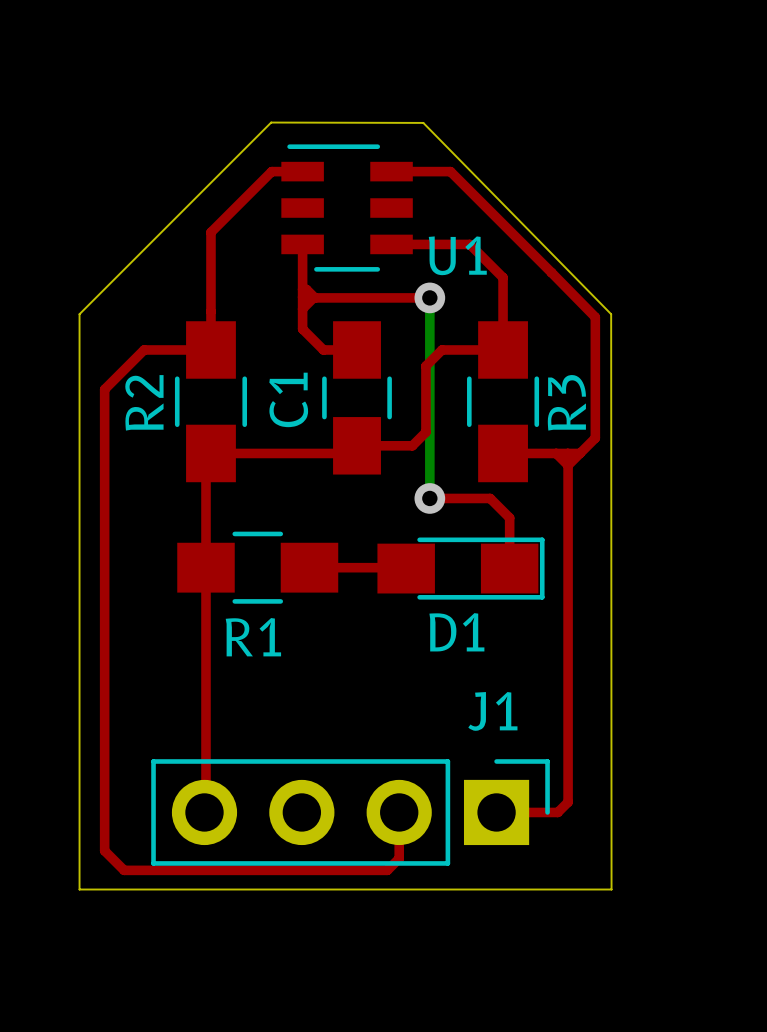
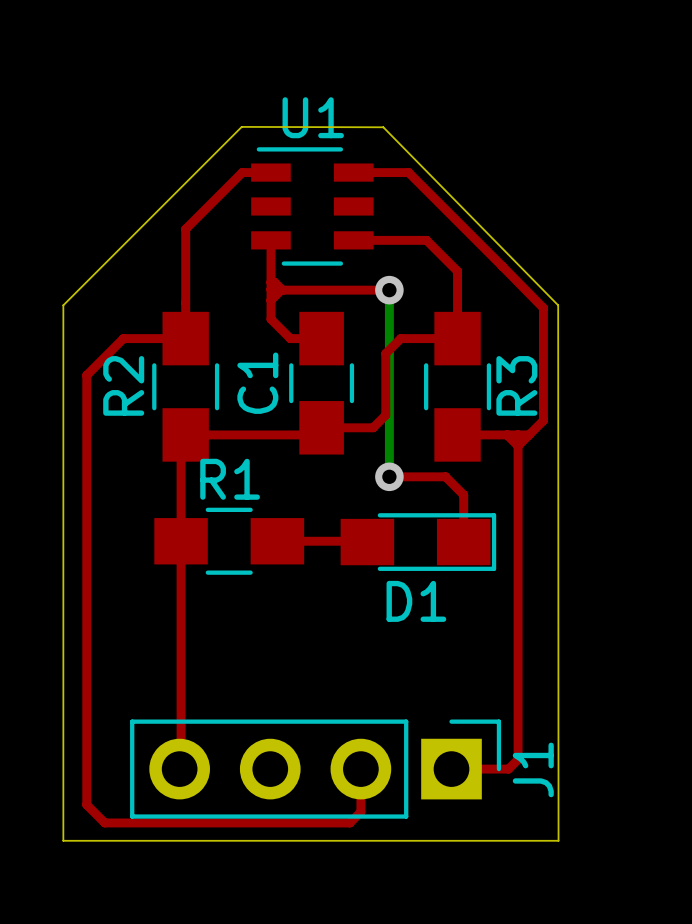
U1 name position: U1 (457, 255) -> U1 (313, 117)
R1 name position: R1 (253, 637) -> R1 (230, 479)
J1 name rotation: 0° (492, 711) -> 90° counterclockwise (533, 769)
J1 name position: J1 (492, 711) -> J1 (533, 769)

